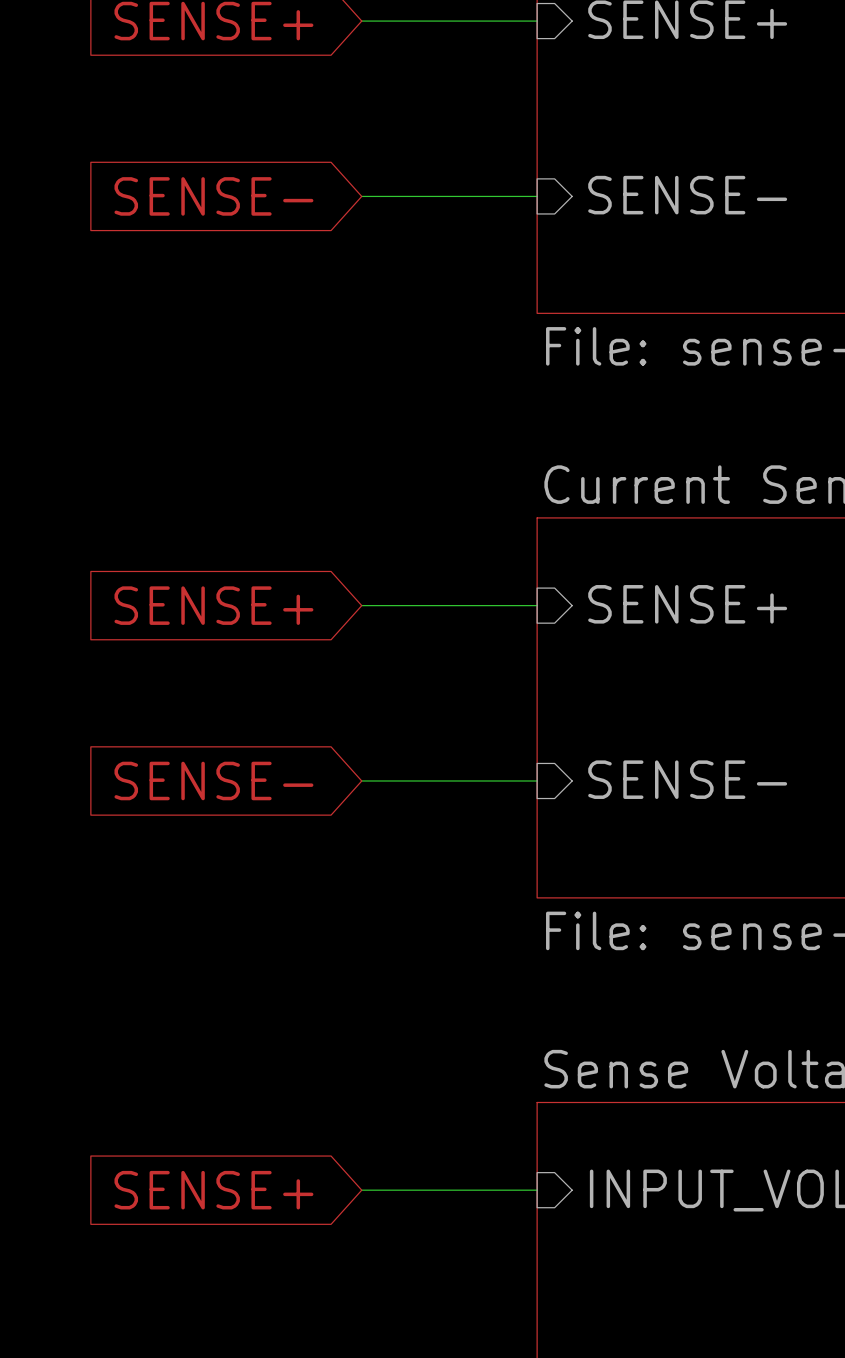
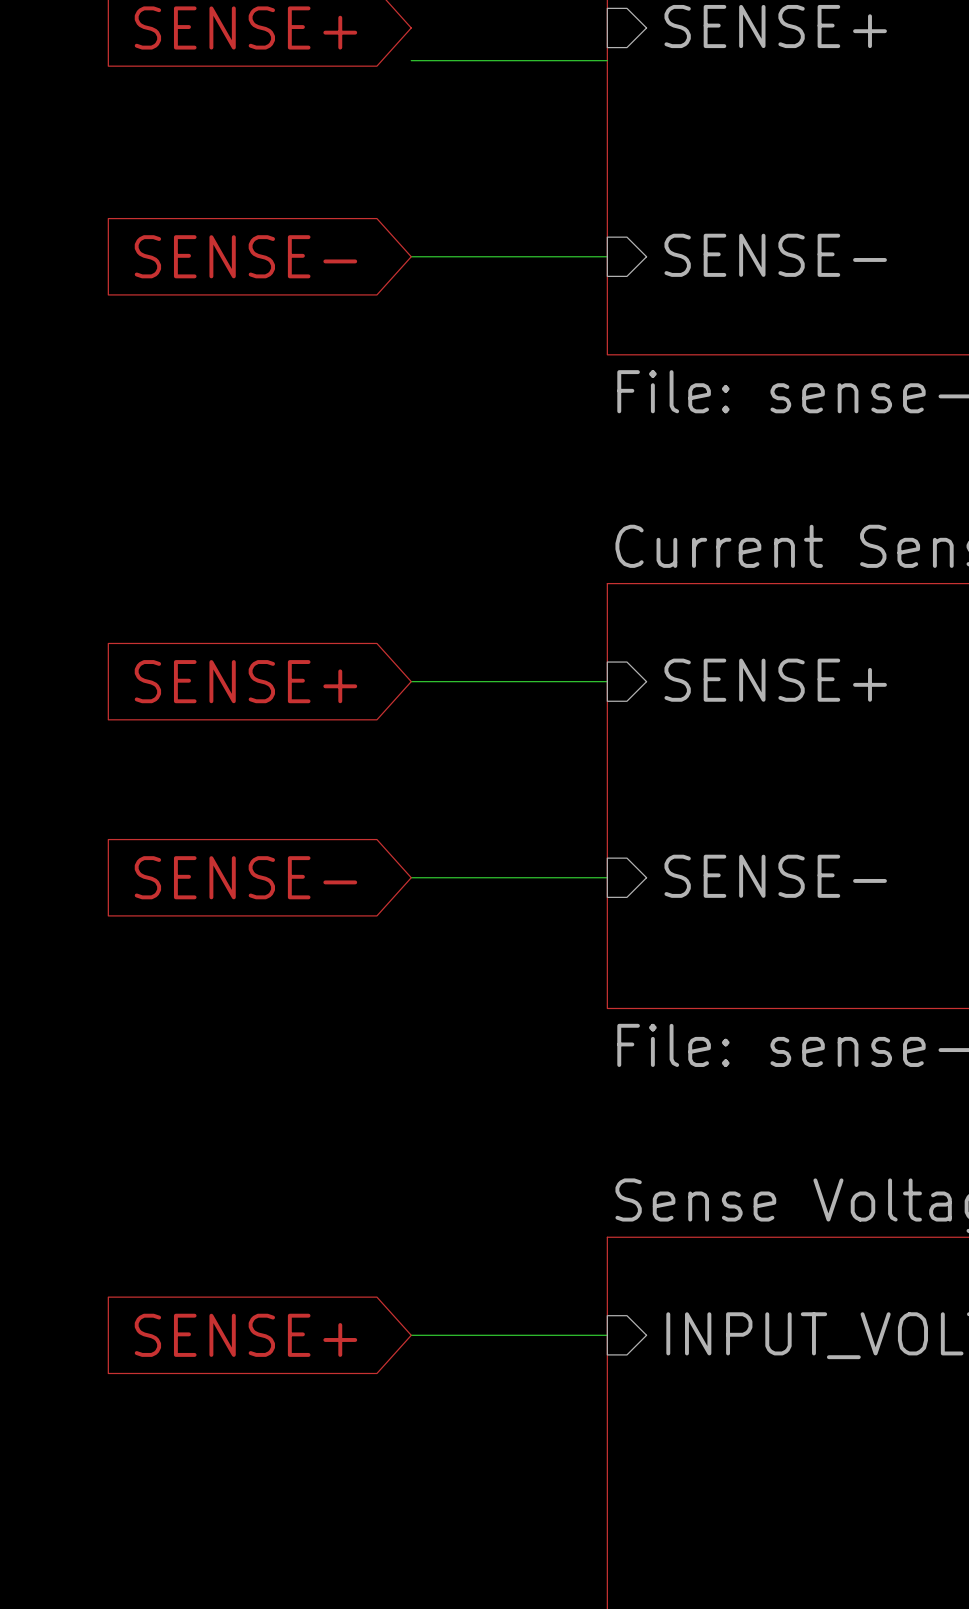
wire: (361, 21) (537, 21) -> (411, 60) (607, 60)
sheet pin position: SENSE- (687, 195) -> SENSE- (775, 255)
global label position: SENSE- (213, 196) -> SENSE- (245, 256)
wire: (361, 196) (537, 196) -> (411, 256) (607, 256)

